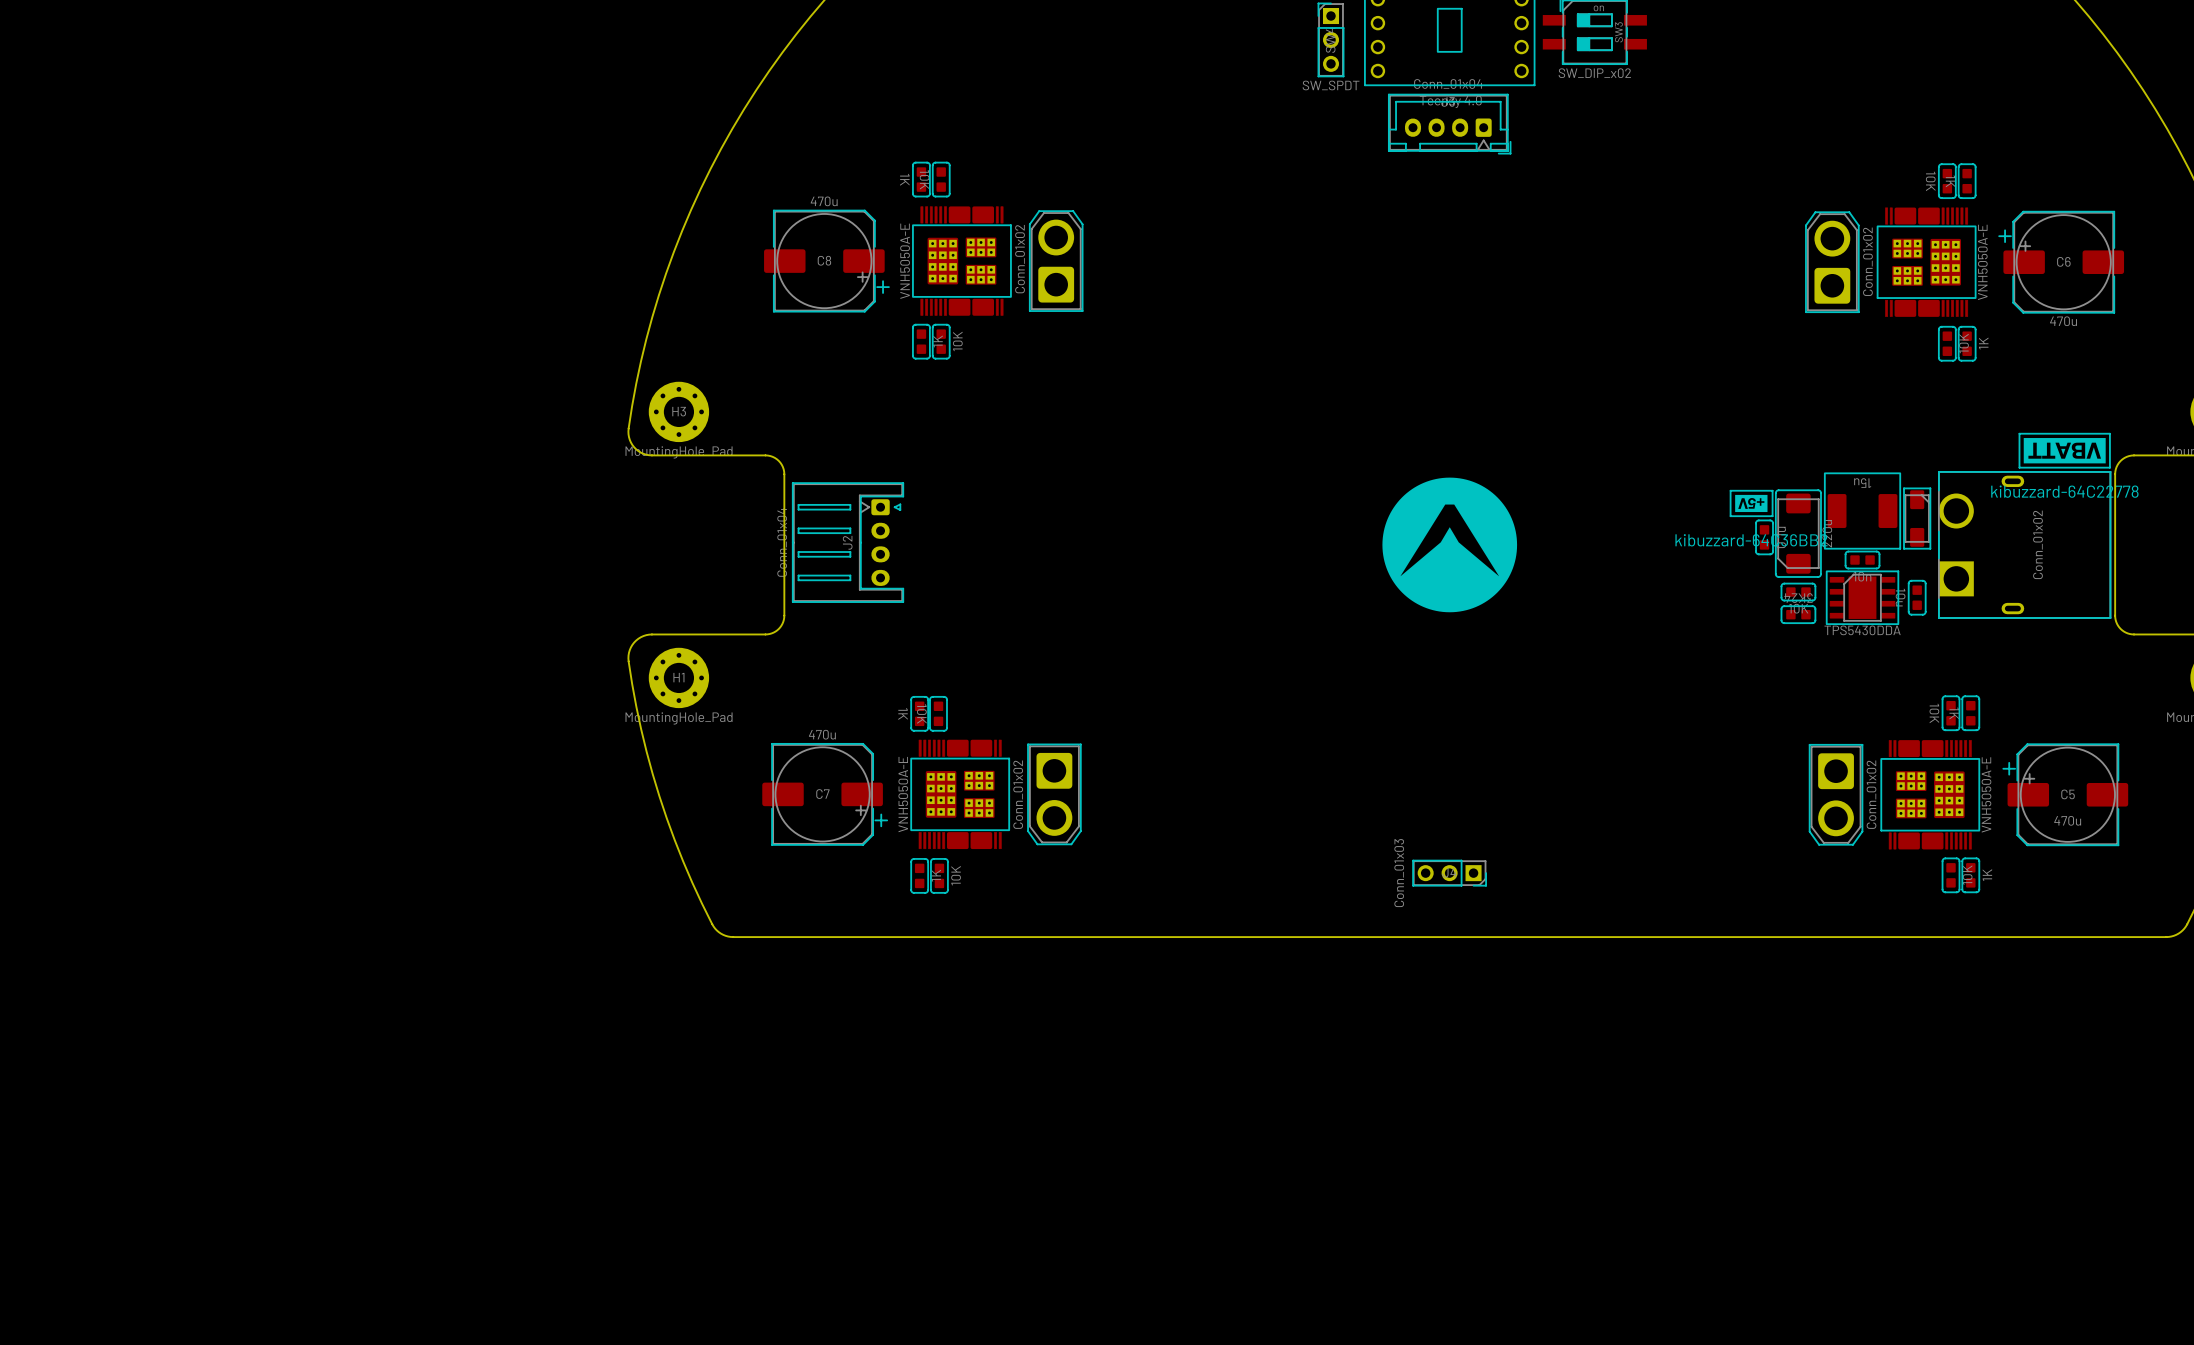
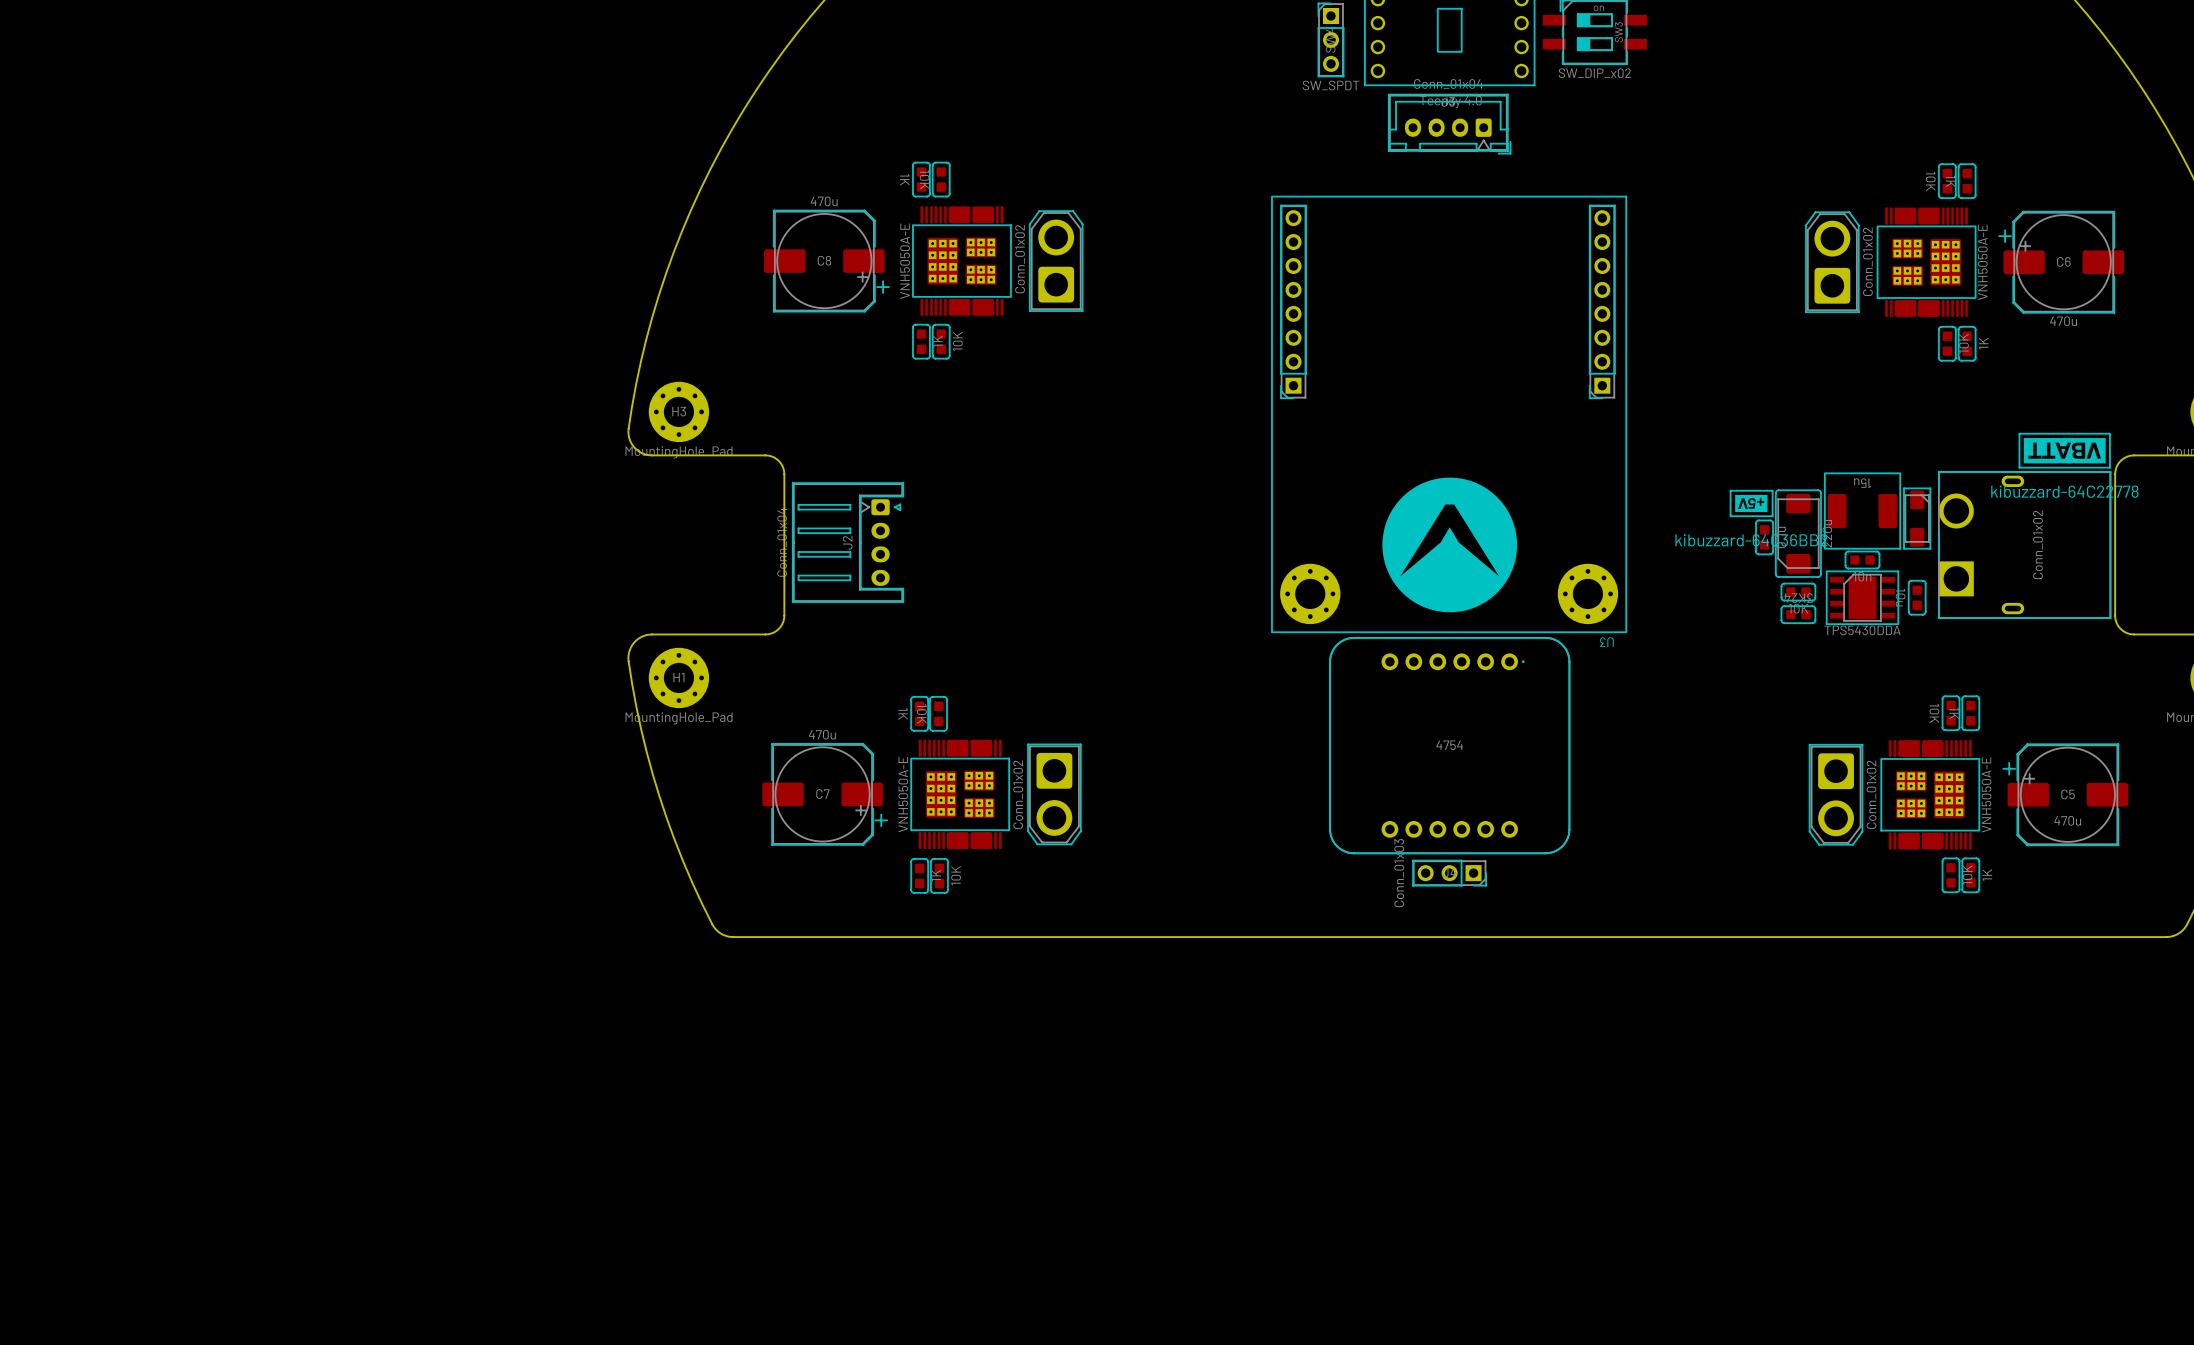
U3: none -> (1449, 414)
part: none -> 4754 (1449, 745)

